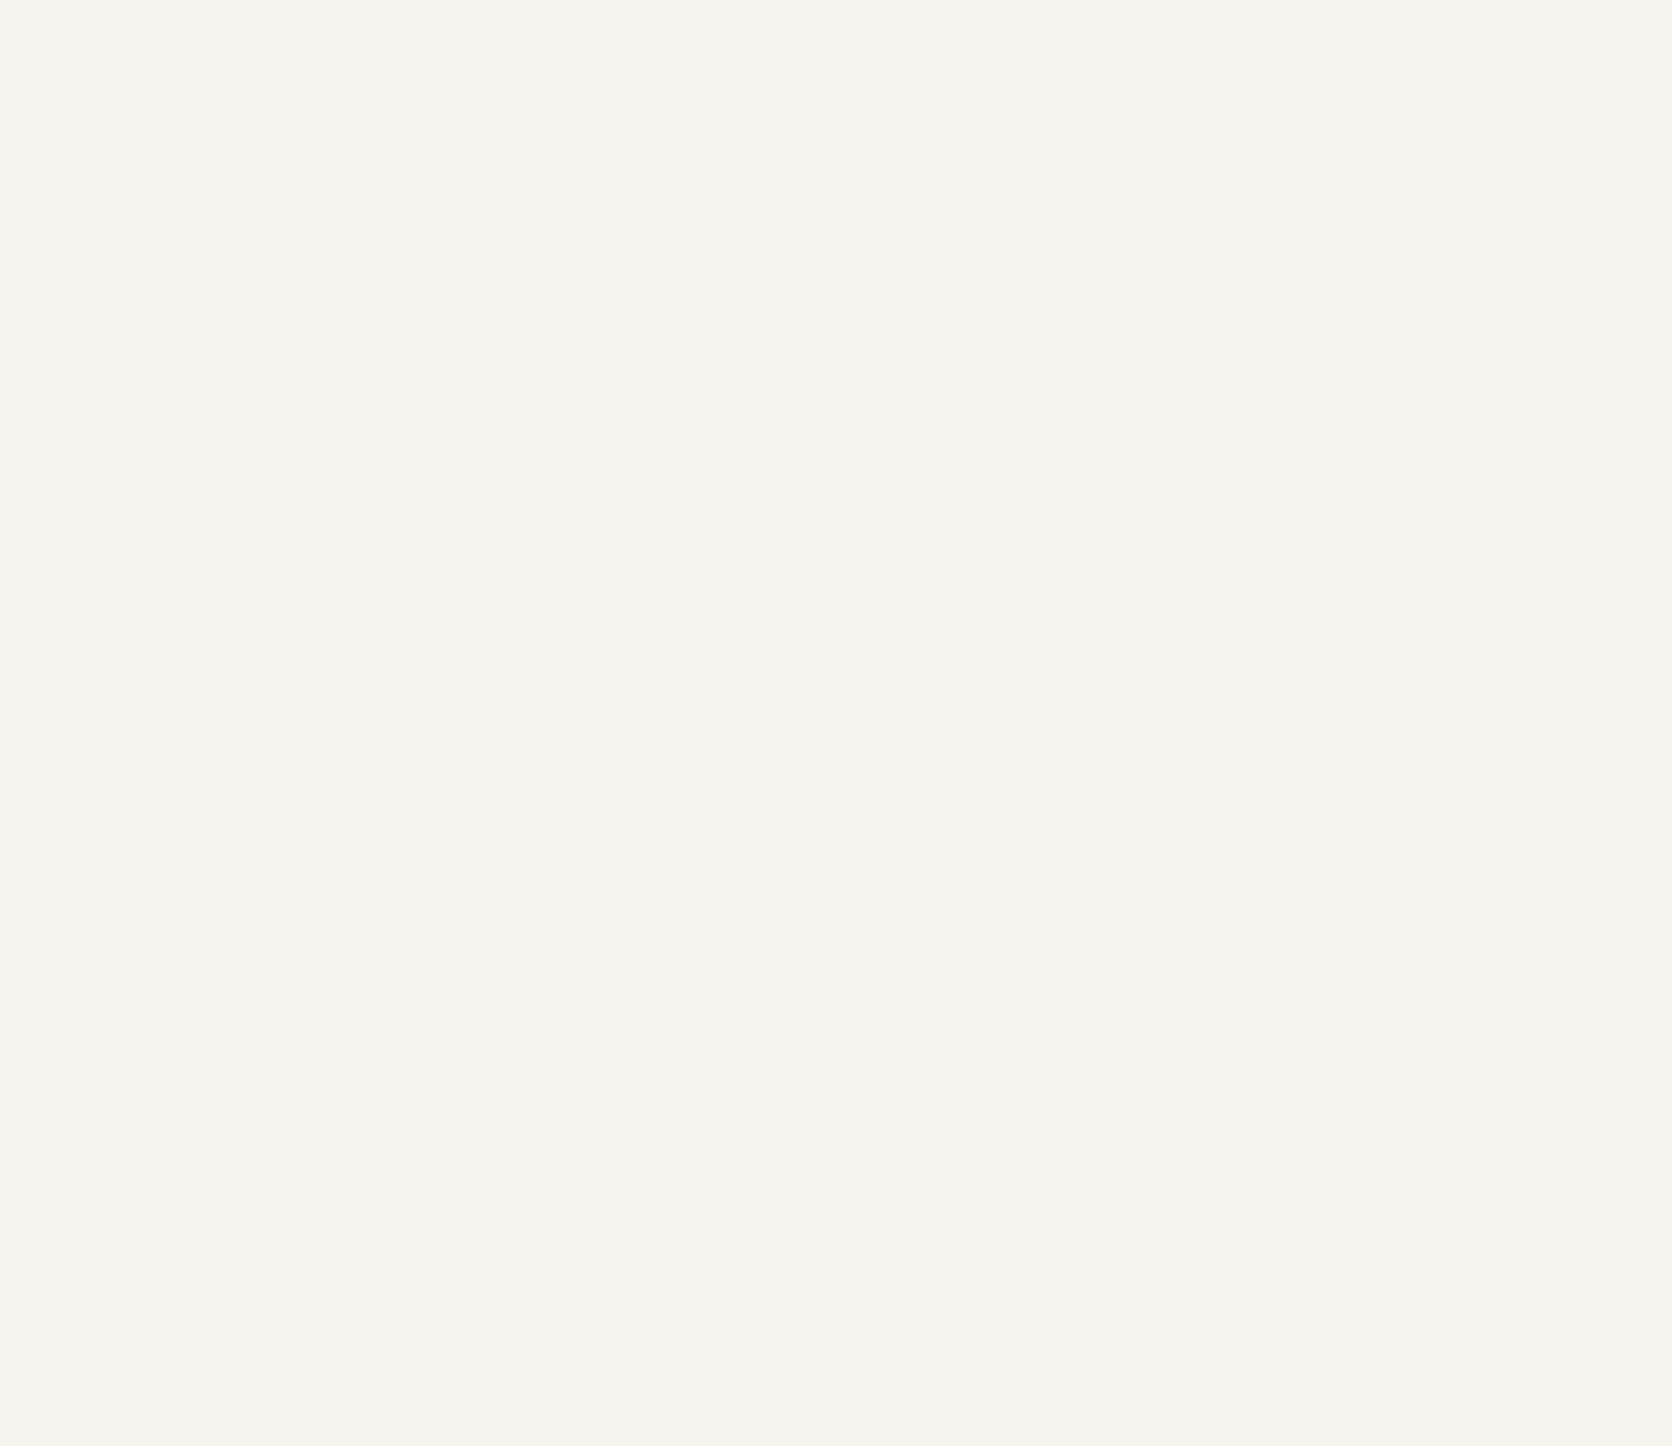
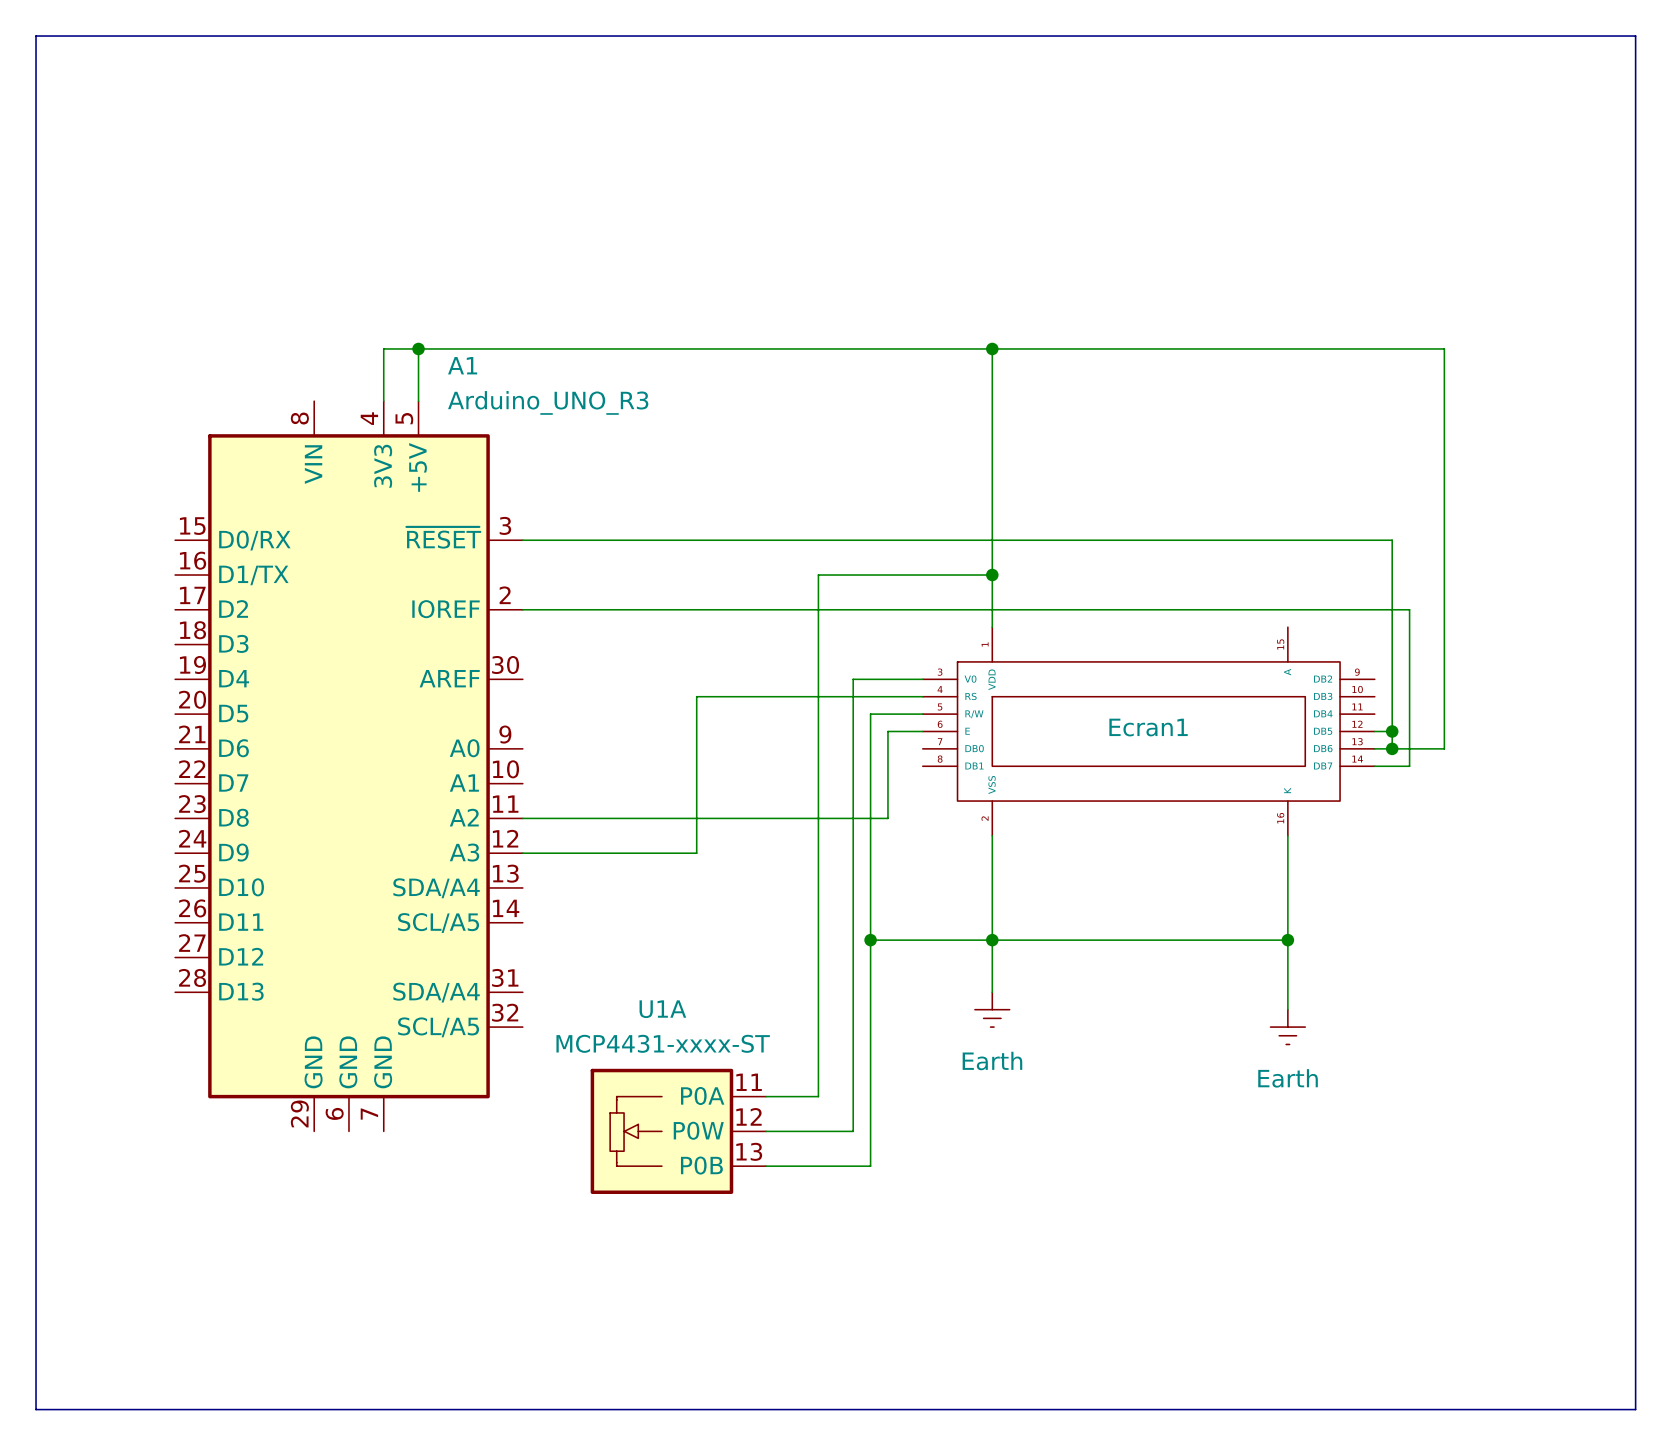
line: none -> (36, 36) (1635, 36) (1635, 1409) (36, 1409) (36, 36)
wire: none -> (418, 348) (418, 401)
junction: none -> (418, 348)
wire: none -> (992, 348) (992, 627)
junction: none -> (992, 348)
wire: none -> (383, 401) (383, 348) (1444, 348) (1444, 748) (1374, 748)
wire: none -> (522, 540) (1392, 540) (1392, 748)
wire: none -> (992, 575) (818, 575) (818, 1096) (766, 1096)
junction: none -> (992, 575)
wire: none -> (522, 609) (1409, 609) (1409, 766) (1374, 766)
wire: none -> (922, 679) (853, 679) (853, 1131) (766, 1131)
wire: none -> (922, 696) (696, 696) (696, 853) (522, 853)
wire: none -> (922, 714) (870, 714) (870, 1166) (766, 1166)
wire: none -> (922, 731) (887, 731) (887, 818) (522, 818)
Ecran1: none -> (1148, 731)
wire: none -> (1374, 731) (1392, 731)
junction: none -> (1392, 731)
junction: none -> (1392, 748)
A1: none -> Arduino_UNO_R3 (348, 766)
wire: none -> (992, 835) (992, 992)
wire: none -> (1287, 835) (1287, 1009)
wire: none -> (870, 940) (1287, 940)
junction: none -> (870, 940)
junction: none -> (992, 940)
junction: none -> (1287, 940)
power symbol: none -> Earth (992, 1009)
power symbol: none -> Earth (1287, 1027)
U1A: none -> MCP4431-xxxx-ST (678, 1131)

